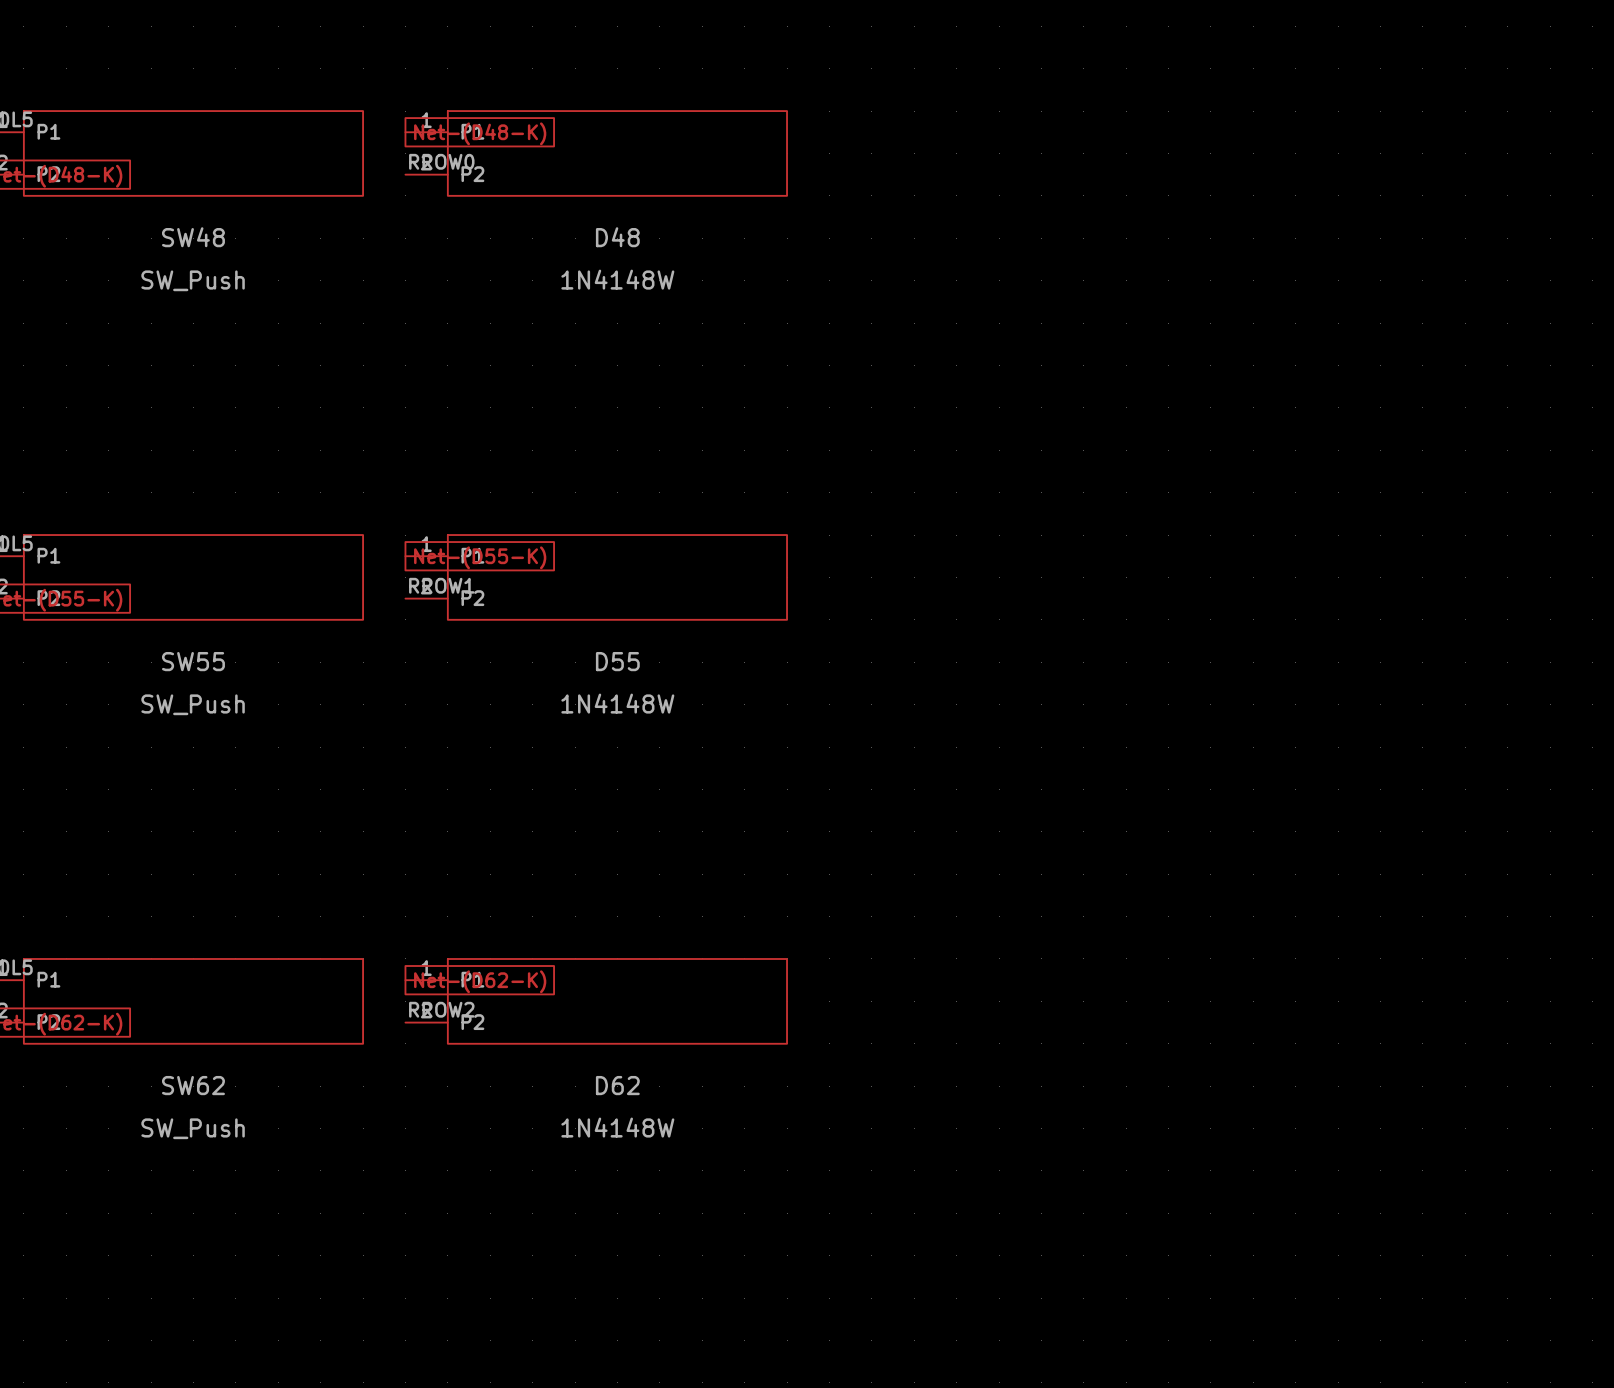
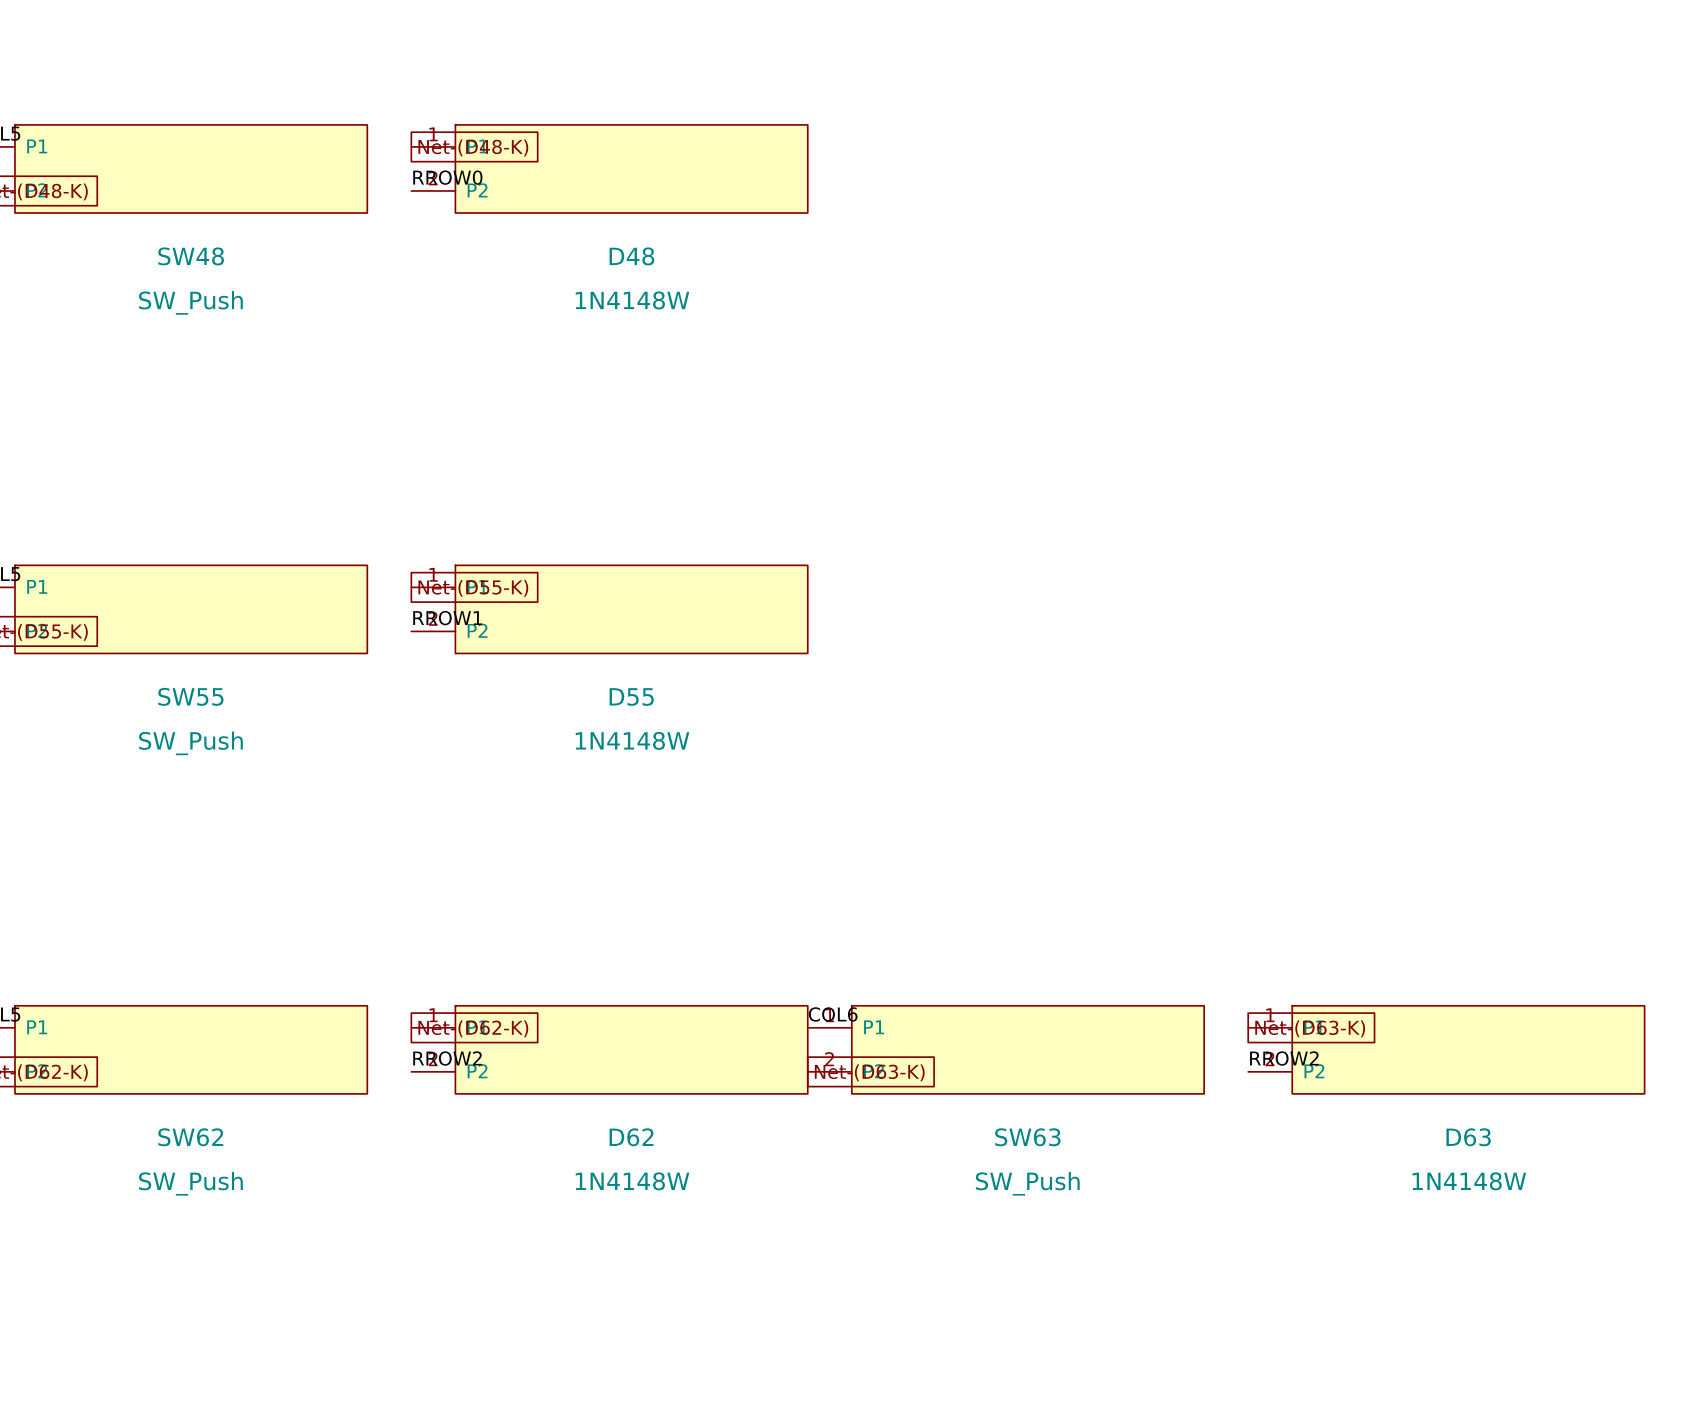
label: none -> COL6 (833, 1014)
global label: none -> Net-(D63-K) (1310, 1028)
SW63: none -> SW_Push (1005, 1049)
D63: none -> 1N4148W (1446, 1049)
label: none -> RROW2 (1284, 1058)
global label: none -> Net-(D63-K) (869, 1072)

